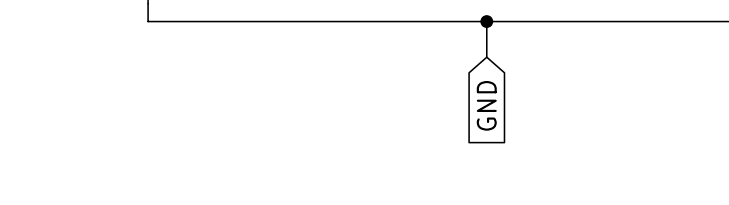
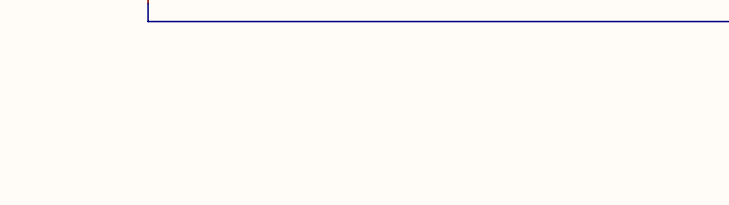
wire: (486, 21) (486, 57) -> none
junction: (486, 21) -> none
global label: GND (486, 105) -> none

